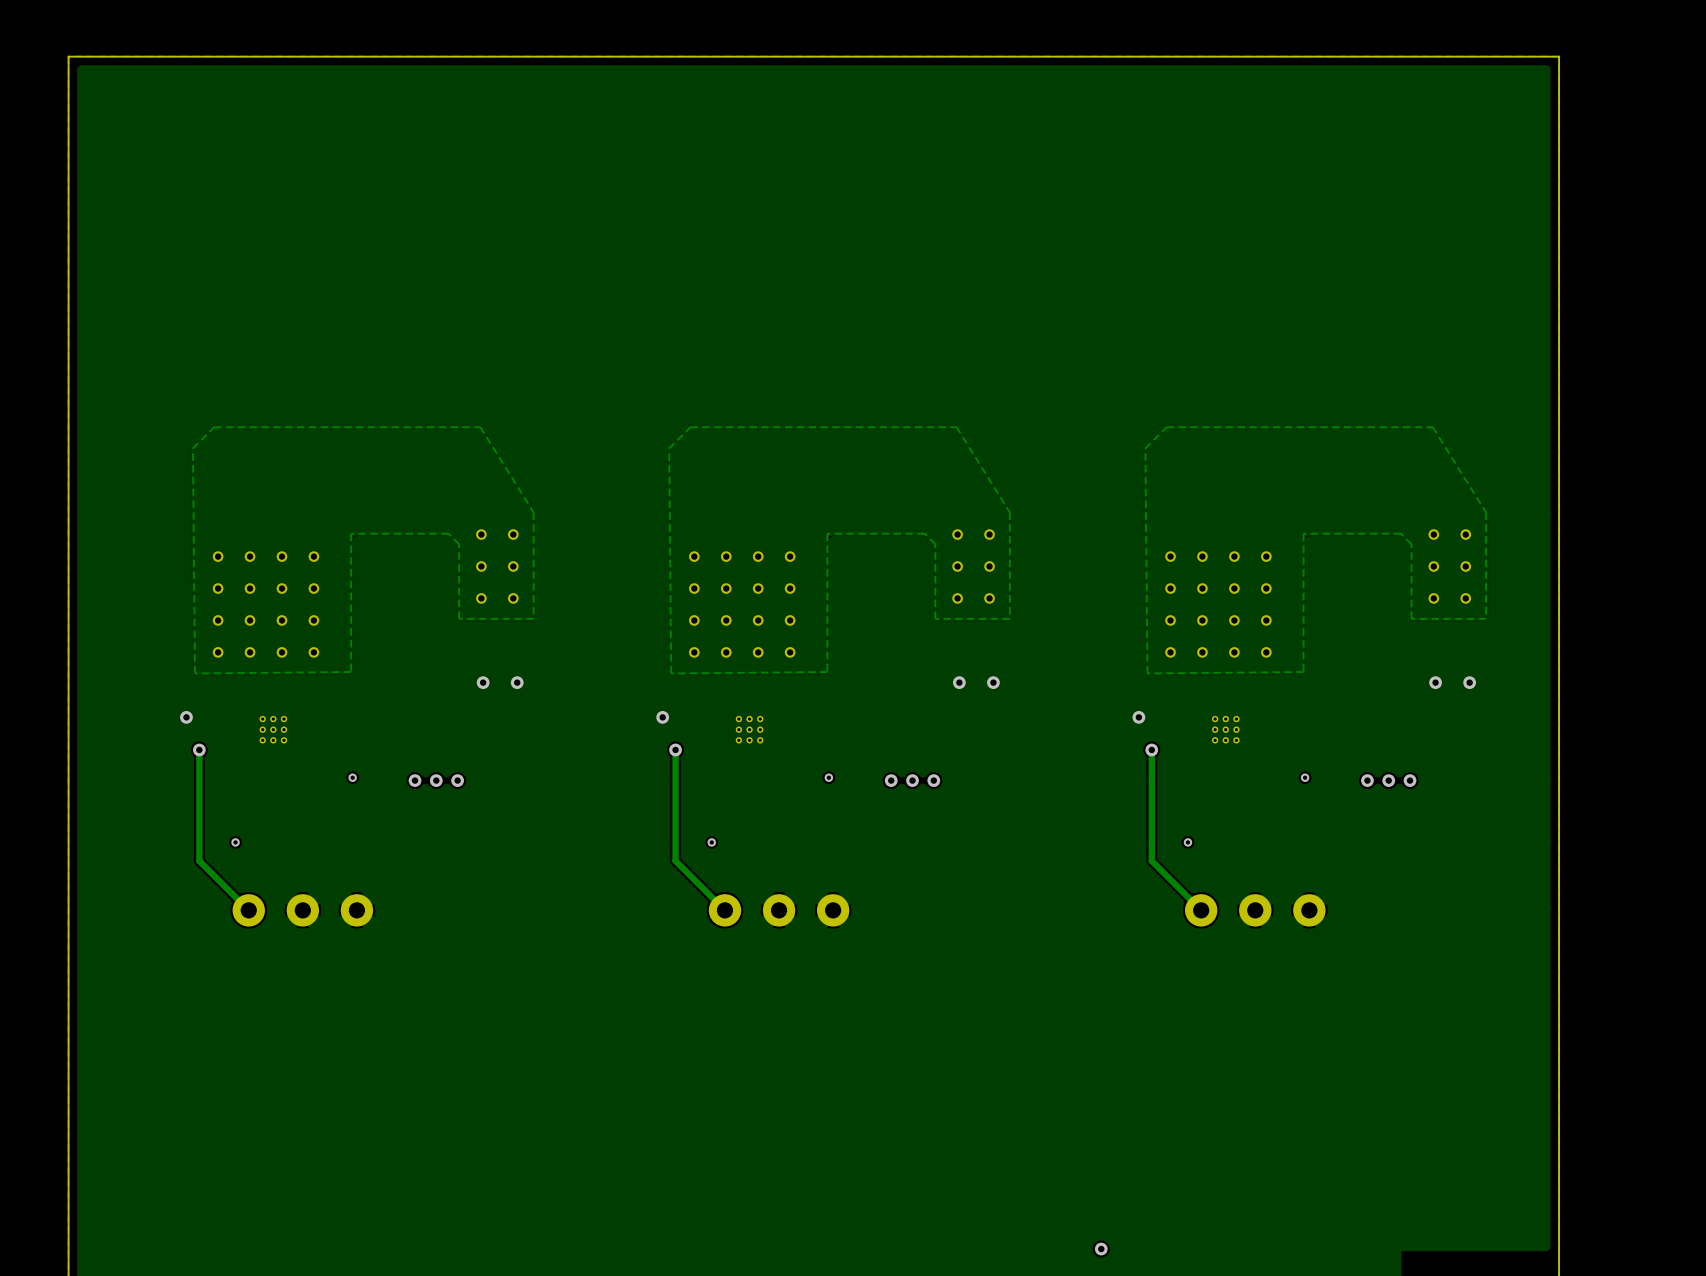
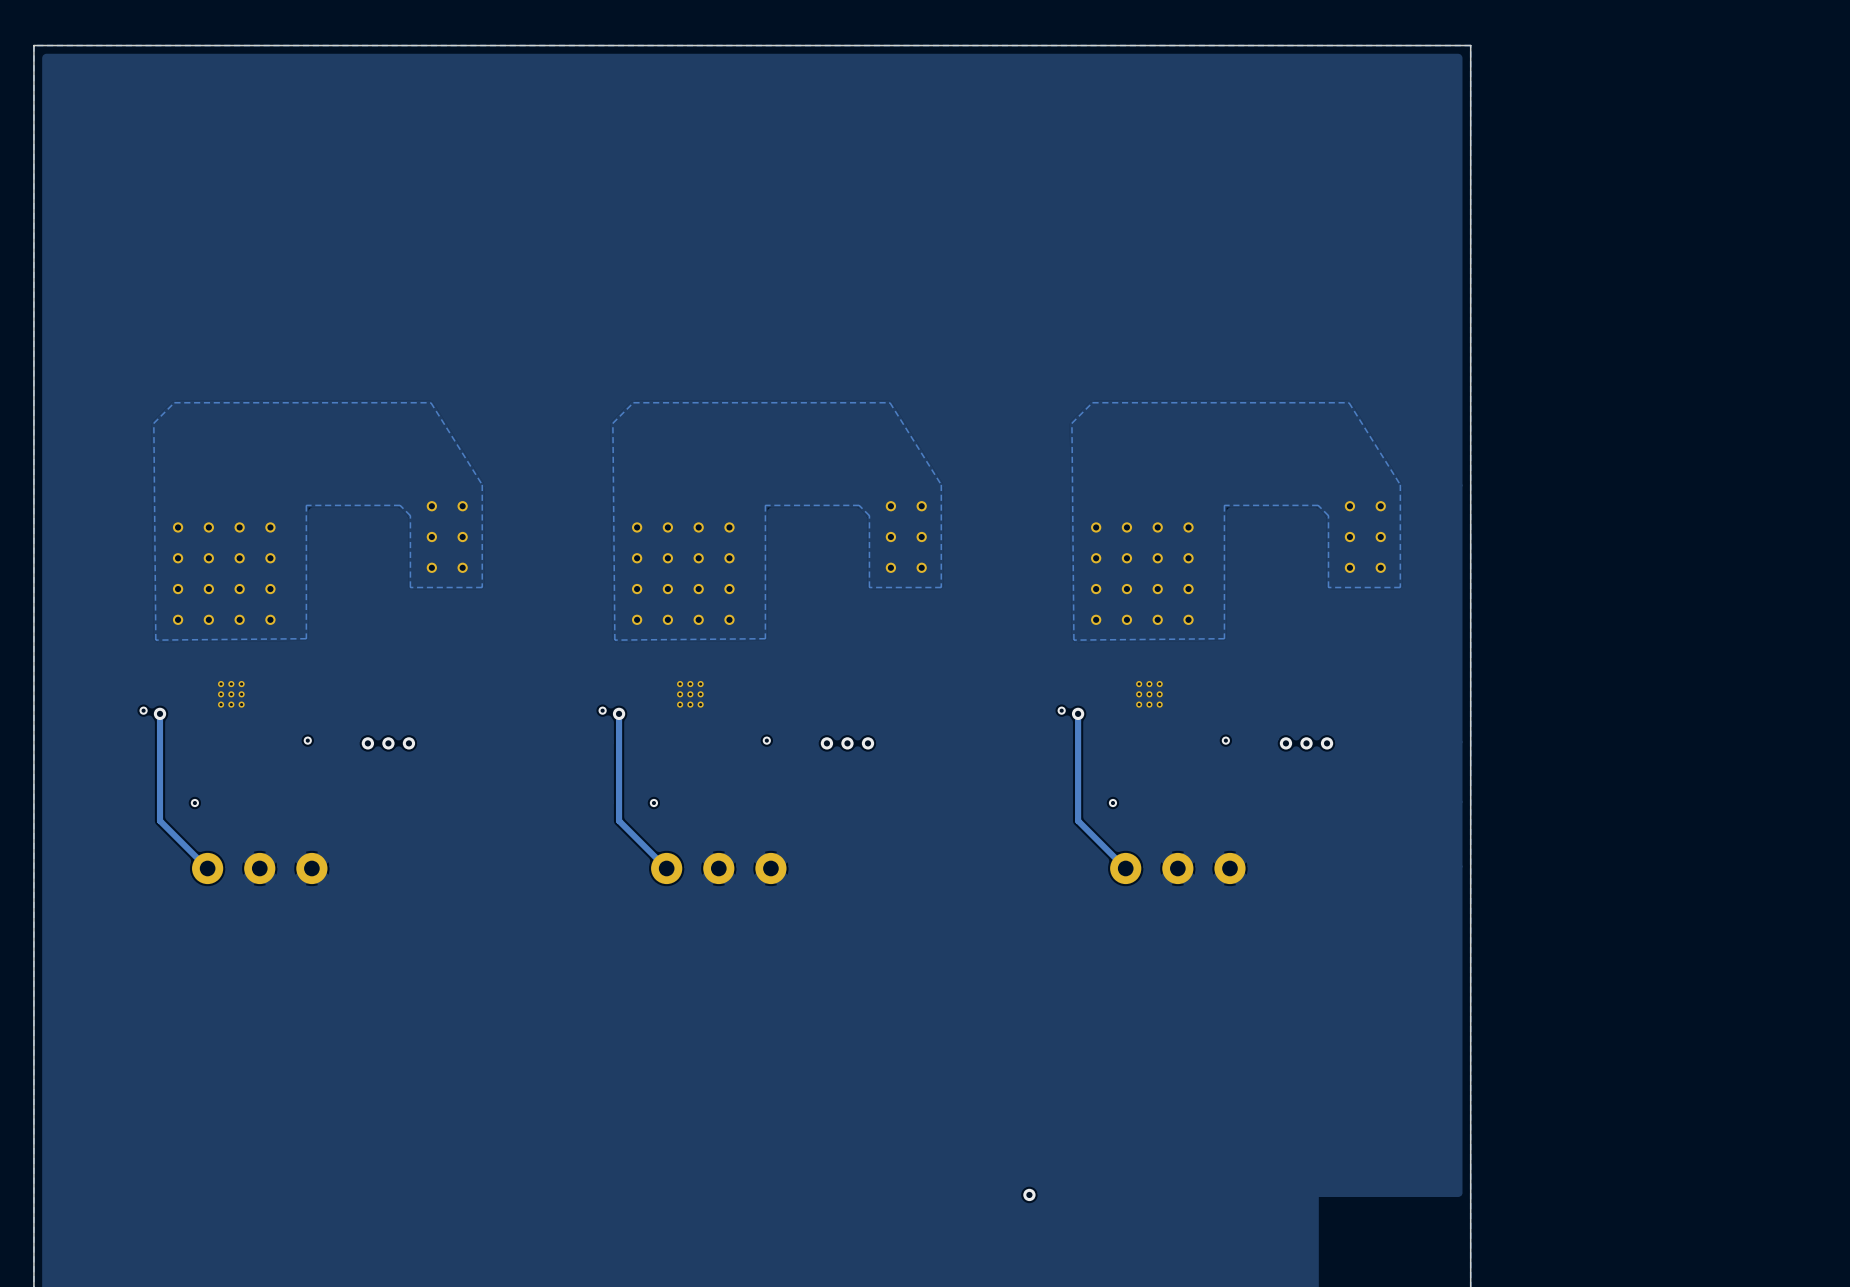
via: (483, 682) -> none
via: (517, 682) -> none
via: (959, 682) -> none
via: (993, 682) -> none
via: (1435, 682) -> none
via: (1469, 682) -> none
via: (186, 717) -> none
via: (662, 717) -> none
via: (1138, 717) -> none
via: none -> (143, 710)
via: none -> (602, 710)
via: none -> (1061, 710)

